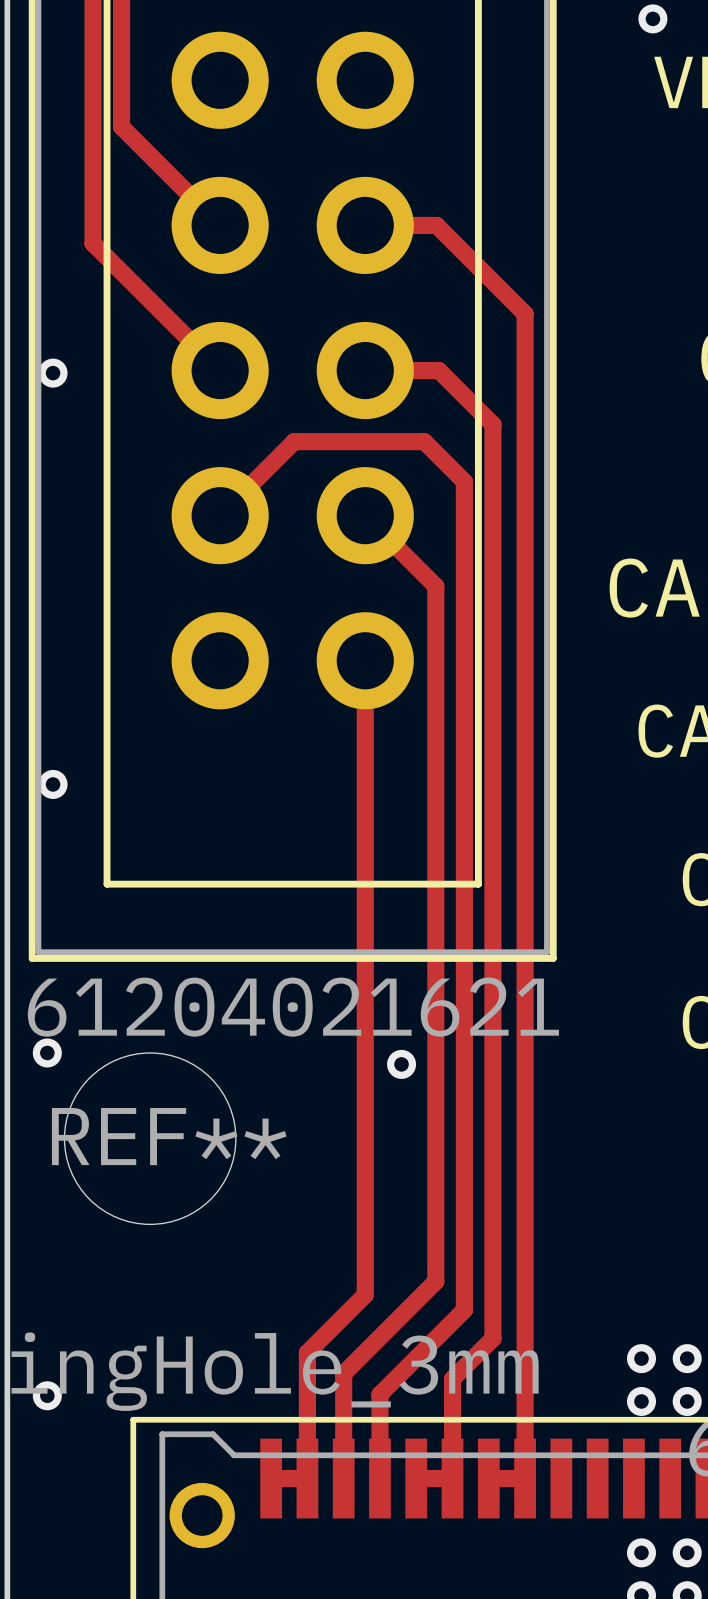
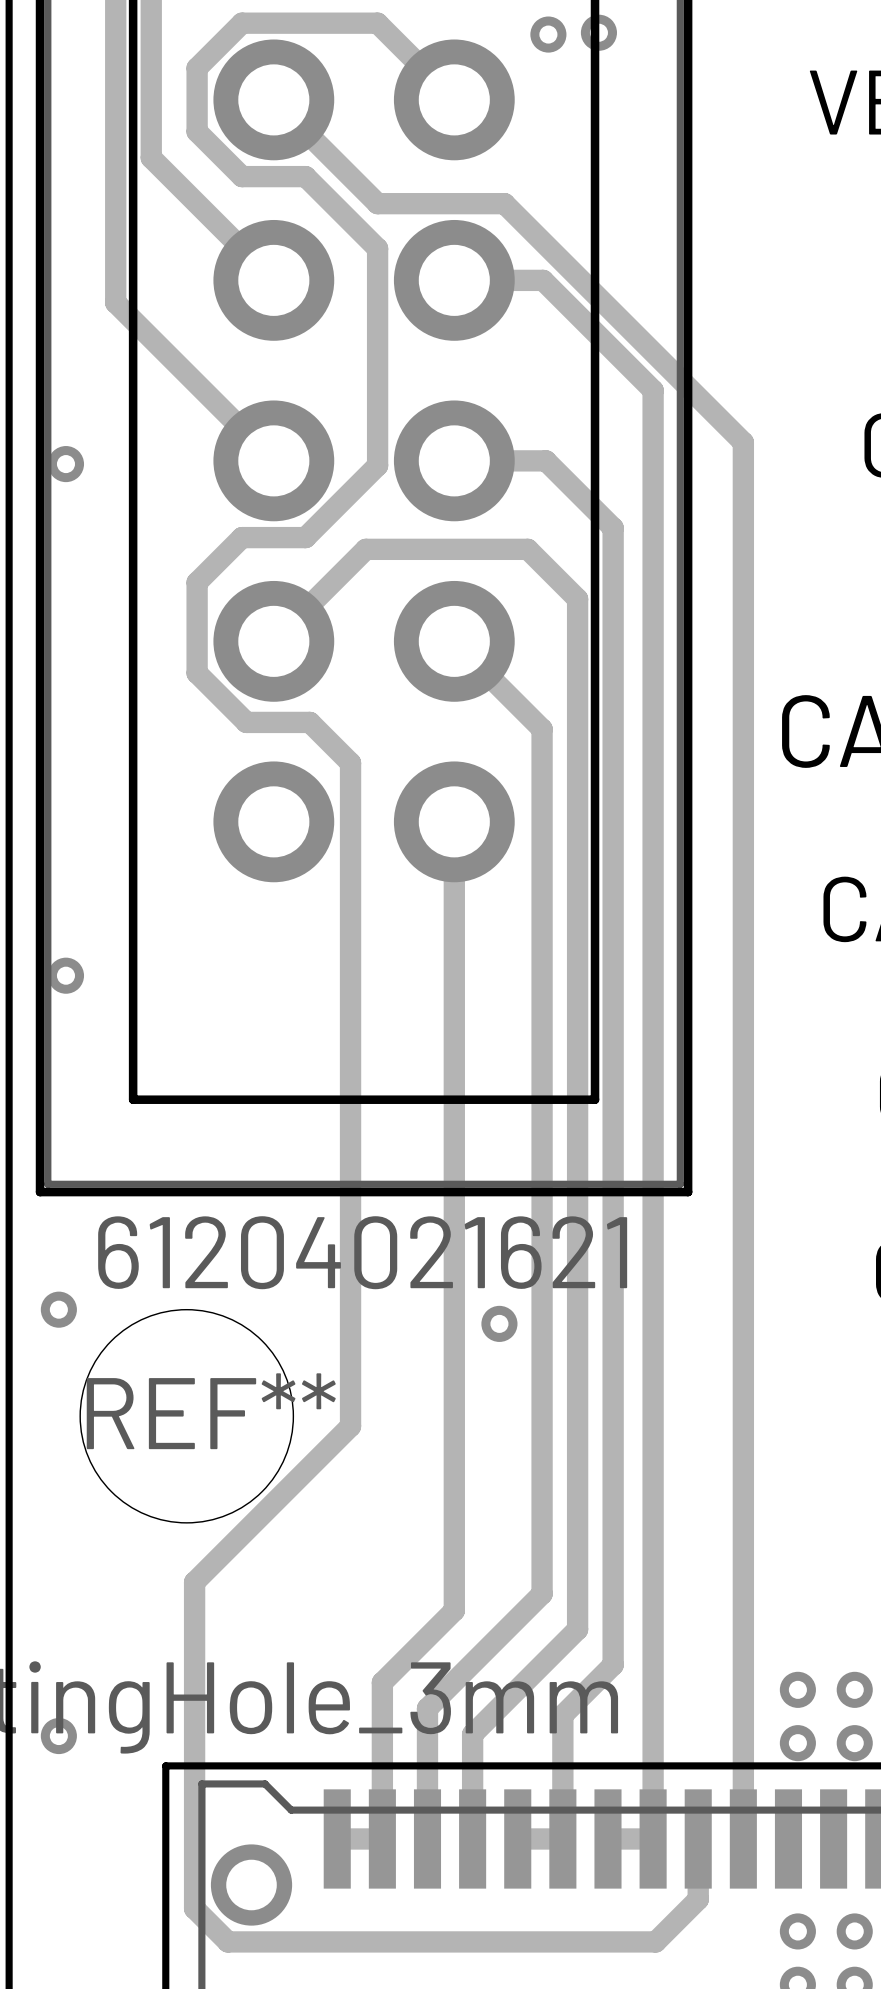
via: (652, 18) -> none
via: none -> (598, 32)
via: none -> (548, 34)
track: none -> (273, 99) (377, 203) (504, 203) (743, 442) (743, 1838)
track: none -> (454, 99) (377, 23) (242, 23) (197, 68) (197, 131) (242, 176) (305, 176) (377, 248) (377, 465) (305, 537) (242, 537) (197, 582) (197, 673) (246, 722) (309, 722) (350, 763) (350, 1426) (194, 1582) (194, 1908) (227, 1941) (655, 1941) (698, 1899) (698, 1838)

